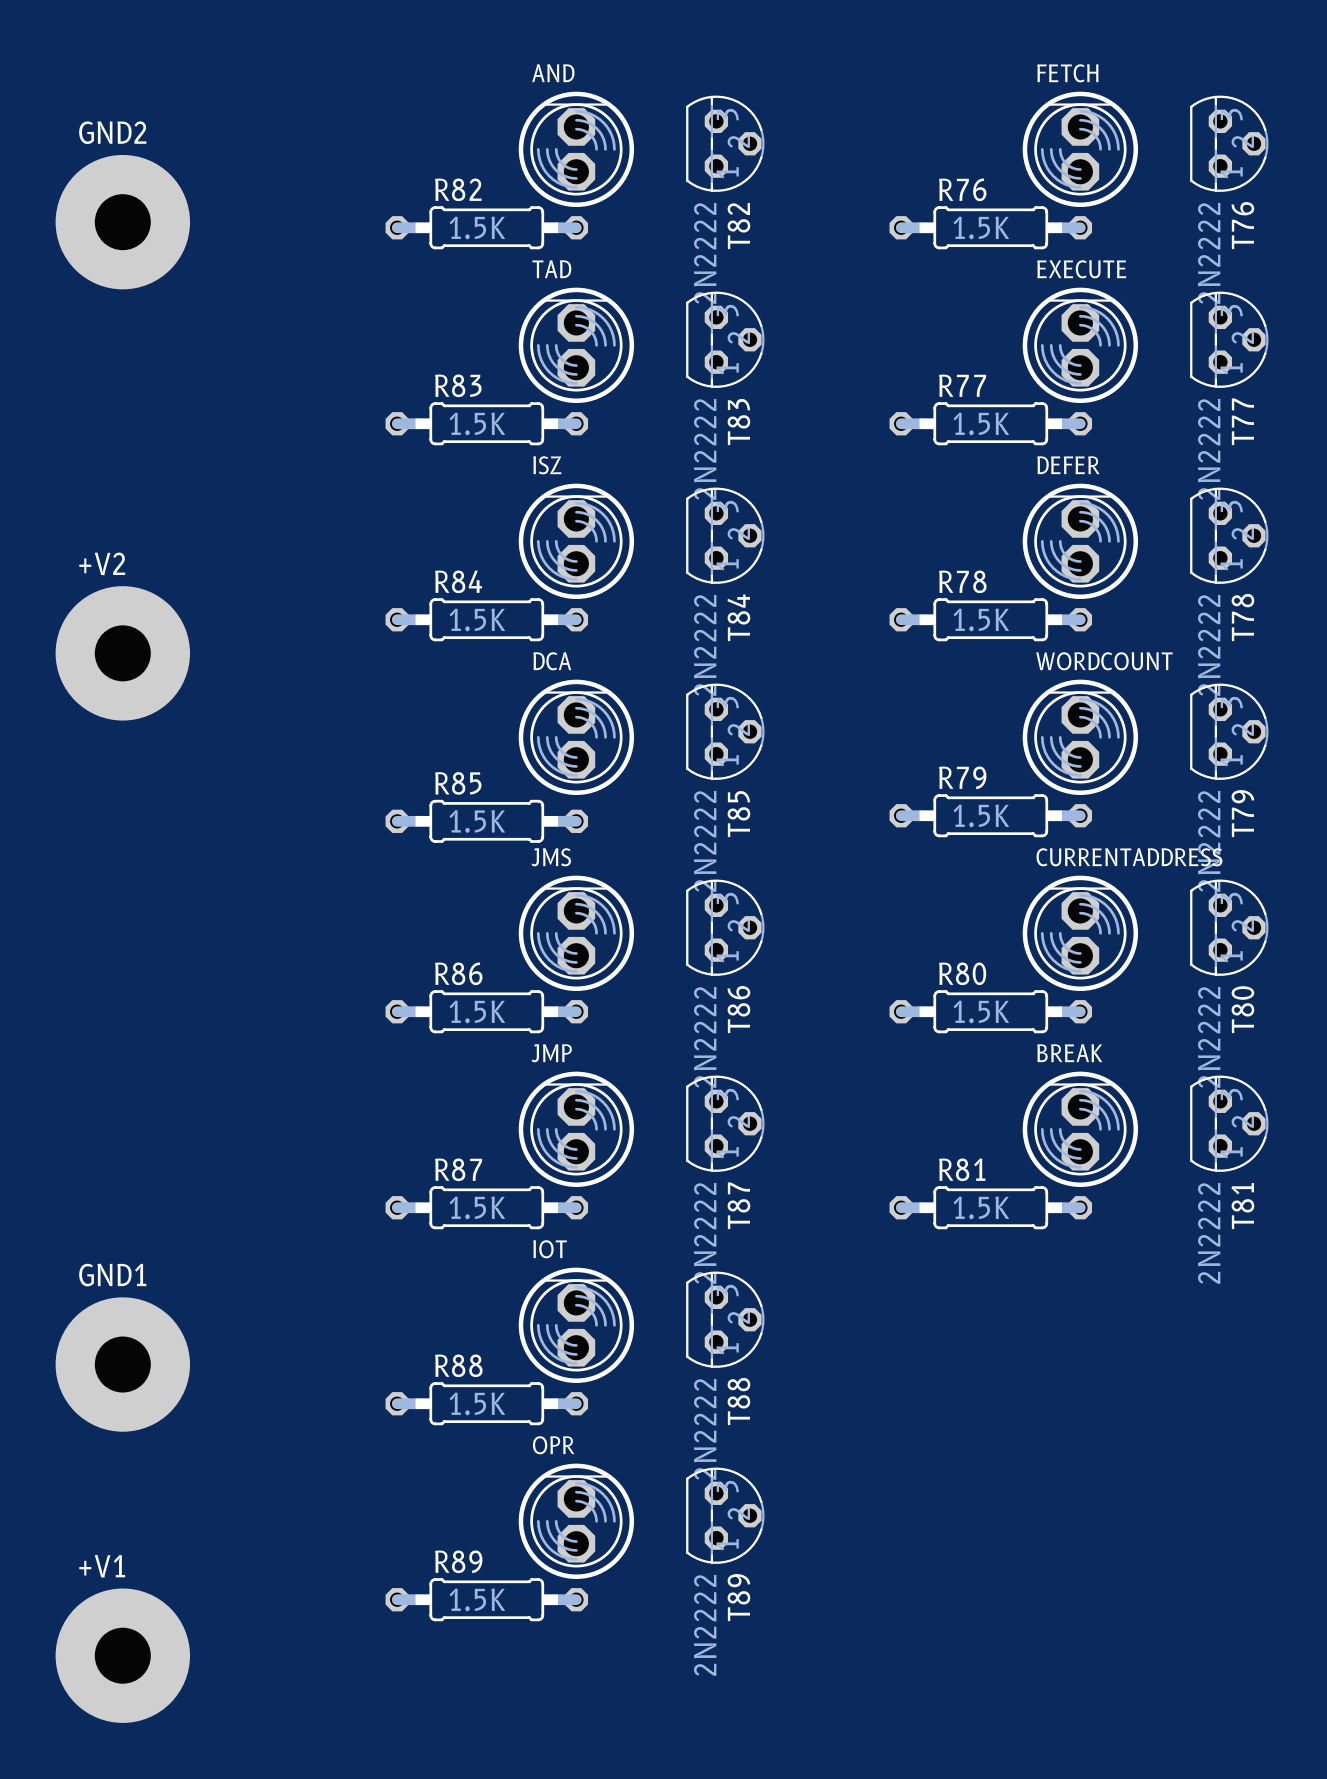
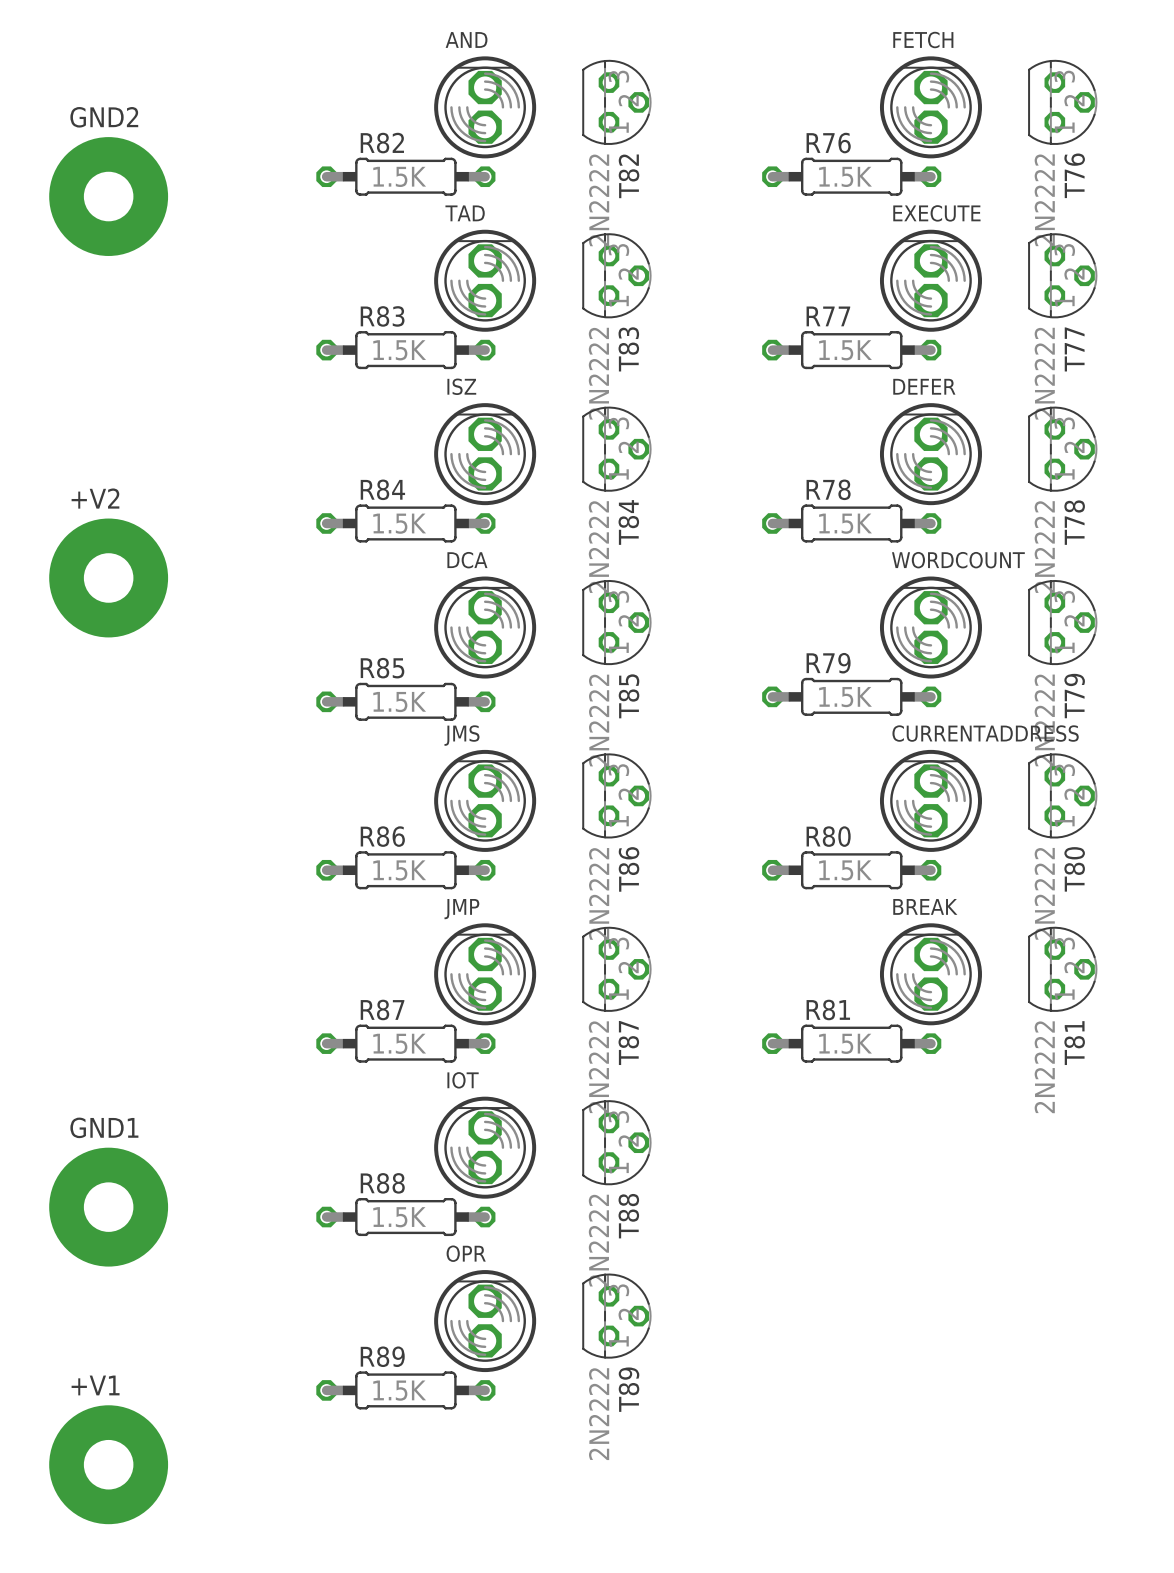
T82 position: (725, 143) -> (616, 102)
T76 position: (1229, 143) -> (1062, 102)
AND position: (576, 149) -> (485, 107)
FETCH position: (1080, 149) -> (930, 107)
R82 position: (486, 227) -> (405, 176)
R76 position: (990, 227) -> (851, 176)
T77 footprint: [1190, 291, 1269, 388] -> [1028, 233, 1098, 319]
T83 position: (725, 339) -> (616, 275)
TAD position: (576, 345) -> (485, 280)
EXECUTE position: (1080, 345) -> (930, 280)
R83 position: (486, 423) -> (405, 350)
R77 position: (990, 423) -> (851, 350)
T84 footprint: [686, 487, 765, 584] -> [582, 406, 652, 492]
T78 footprint: [1190, 487, 1269, 584] -> [1028, 406, 1098, 492]
ISZ position: (576, 541) -> (485, 454)
DEFER position: (1080, 541) -> (930, 454)
R84 position: (486, 619) -> (405, 523)
R78 position: (990, 619) -> (851, 523)
T85 position: (725, 731) -> (616, 622)
T79 position: (1229, 731) -> (1062, 622)
DCA position: (576, 737) -> (485, 627)
WORDCOUNT position: (1080, 737) -> (930, 627)
R79 position: (990, 815) -> (851, 696)
R85 position: (486, 821) -> (405, 701)
T86 position: (725, 927) -> (616, 795)
T80 position: (1229, 927) -> (1062, 795)
JMS position: (576, 933) -> (485, 800)
CURRENTADDRESS position: (1080, 933) -> (930, 800)
R86 position: (486, 1011) -> (405, 870)
R80 position: (990, 1011) -> (851, 870)
T81 footprint: [1190, 1075, 1269, 1172] -> [1028, 926, 1098, 1012]
T87 position: (725, 1123) -> (616, 969)
JMP position: (576, 1129) -> (485, 974)
BREAK position: (1080, 1129) -> (930, 974)
R87 position: (486, 1207) -> (405, 1043)
R81 position: (990, 1207) -> (851, 1043)
T88 footprint: [686, 1271, 765, 1368] -> [582, 1100, 652, 1186]
IOT position: (576, 1325) -> (485, 1147)
R88 position: (486, 1403) -> (405, 1217)
T89 position: (725, 1515) -> (616, 1316)
OPR position: (576, 1521) -> (485, 1321)
R89 position: (486, 1599) -> (405, 1390)

